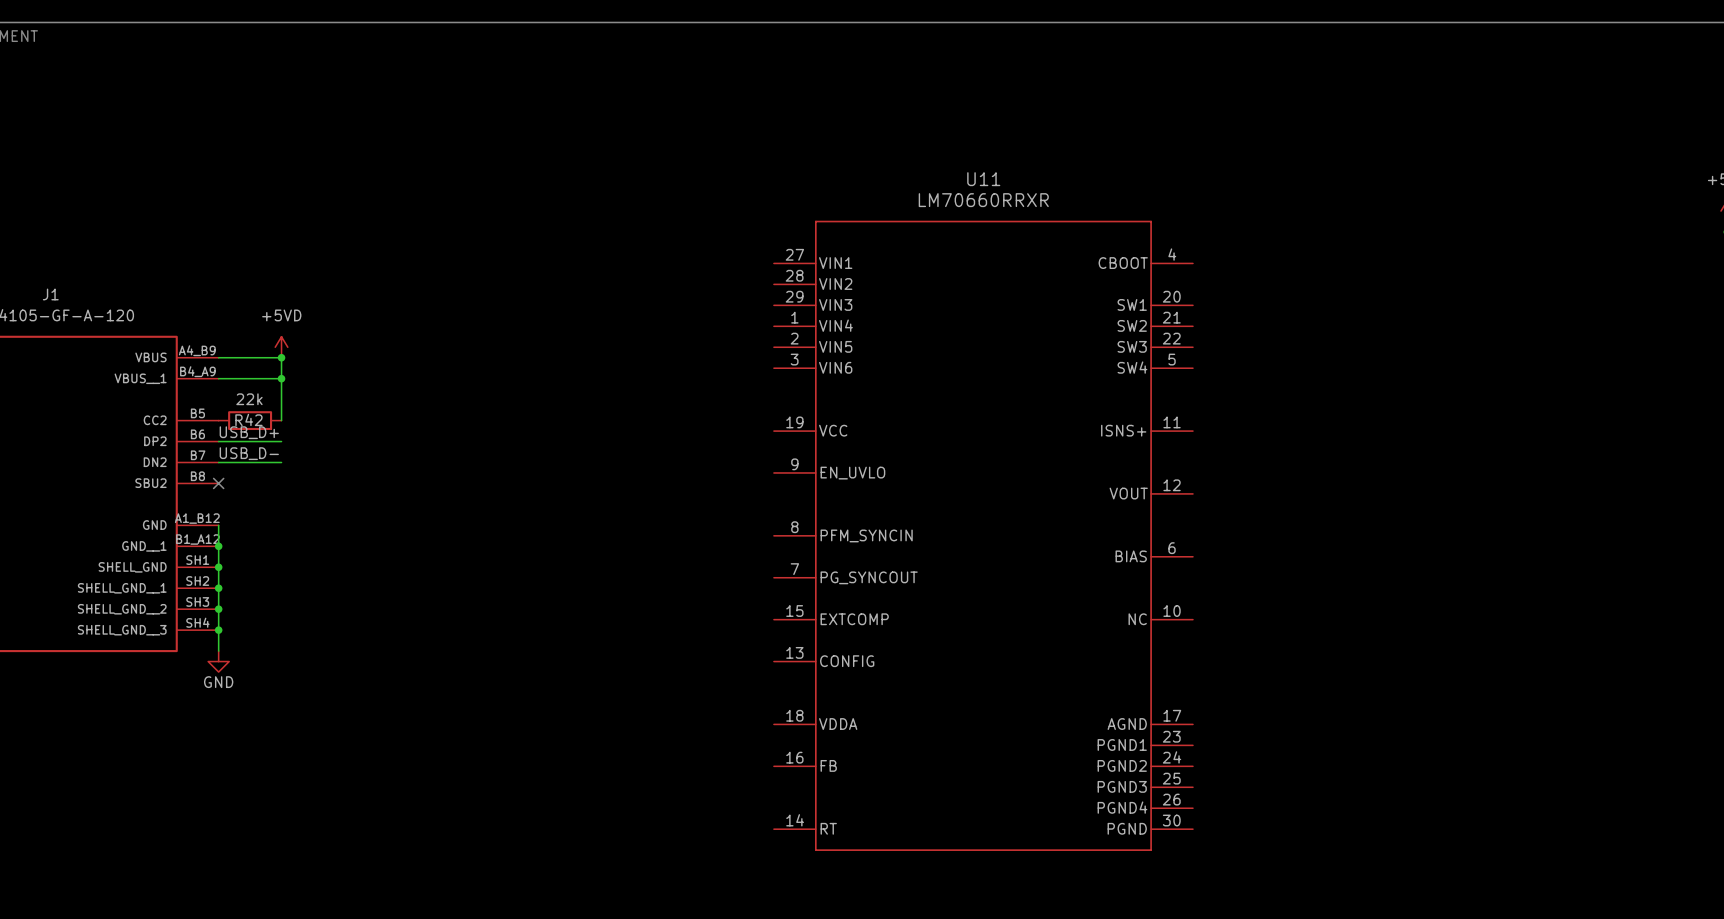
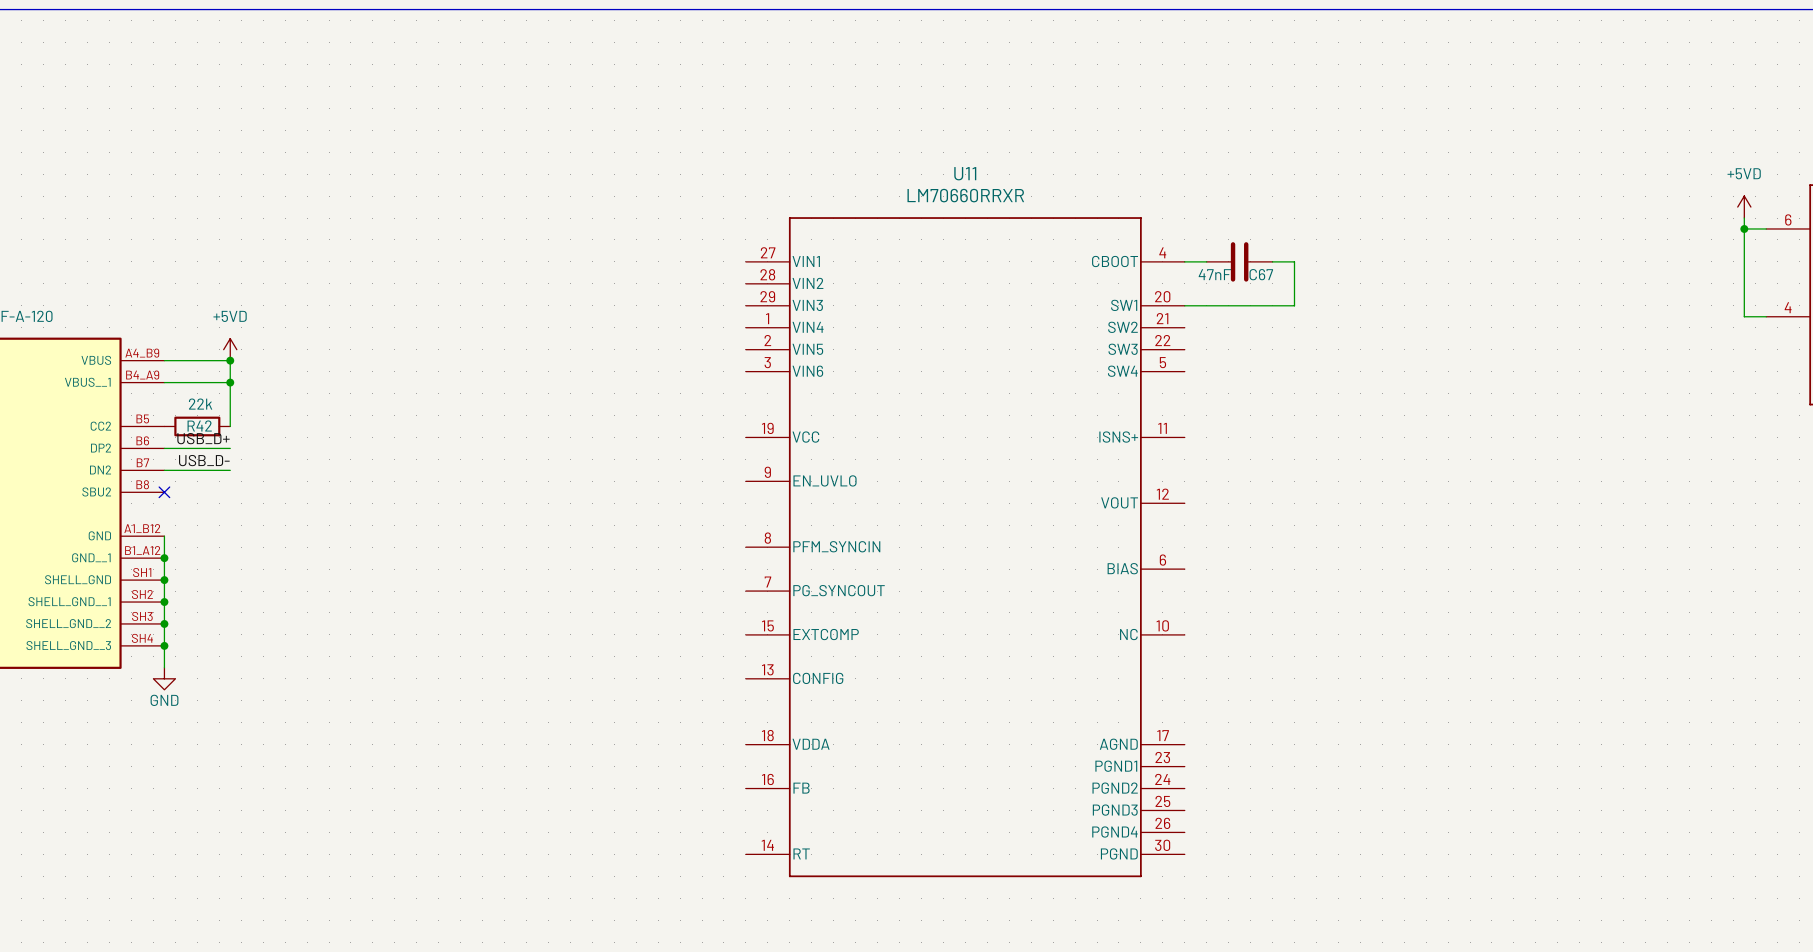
wire: none -> (1184, 261) (1206, 261)
C67: none -> 47nF (1239, 261)
wire: none -> (1272, 261) (1294, 261) (1294, 305) (1184, 305)

